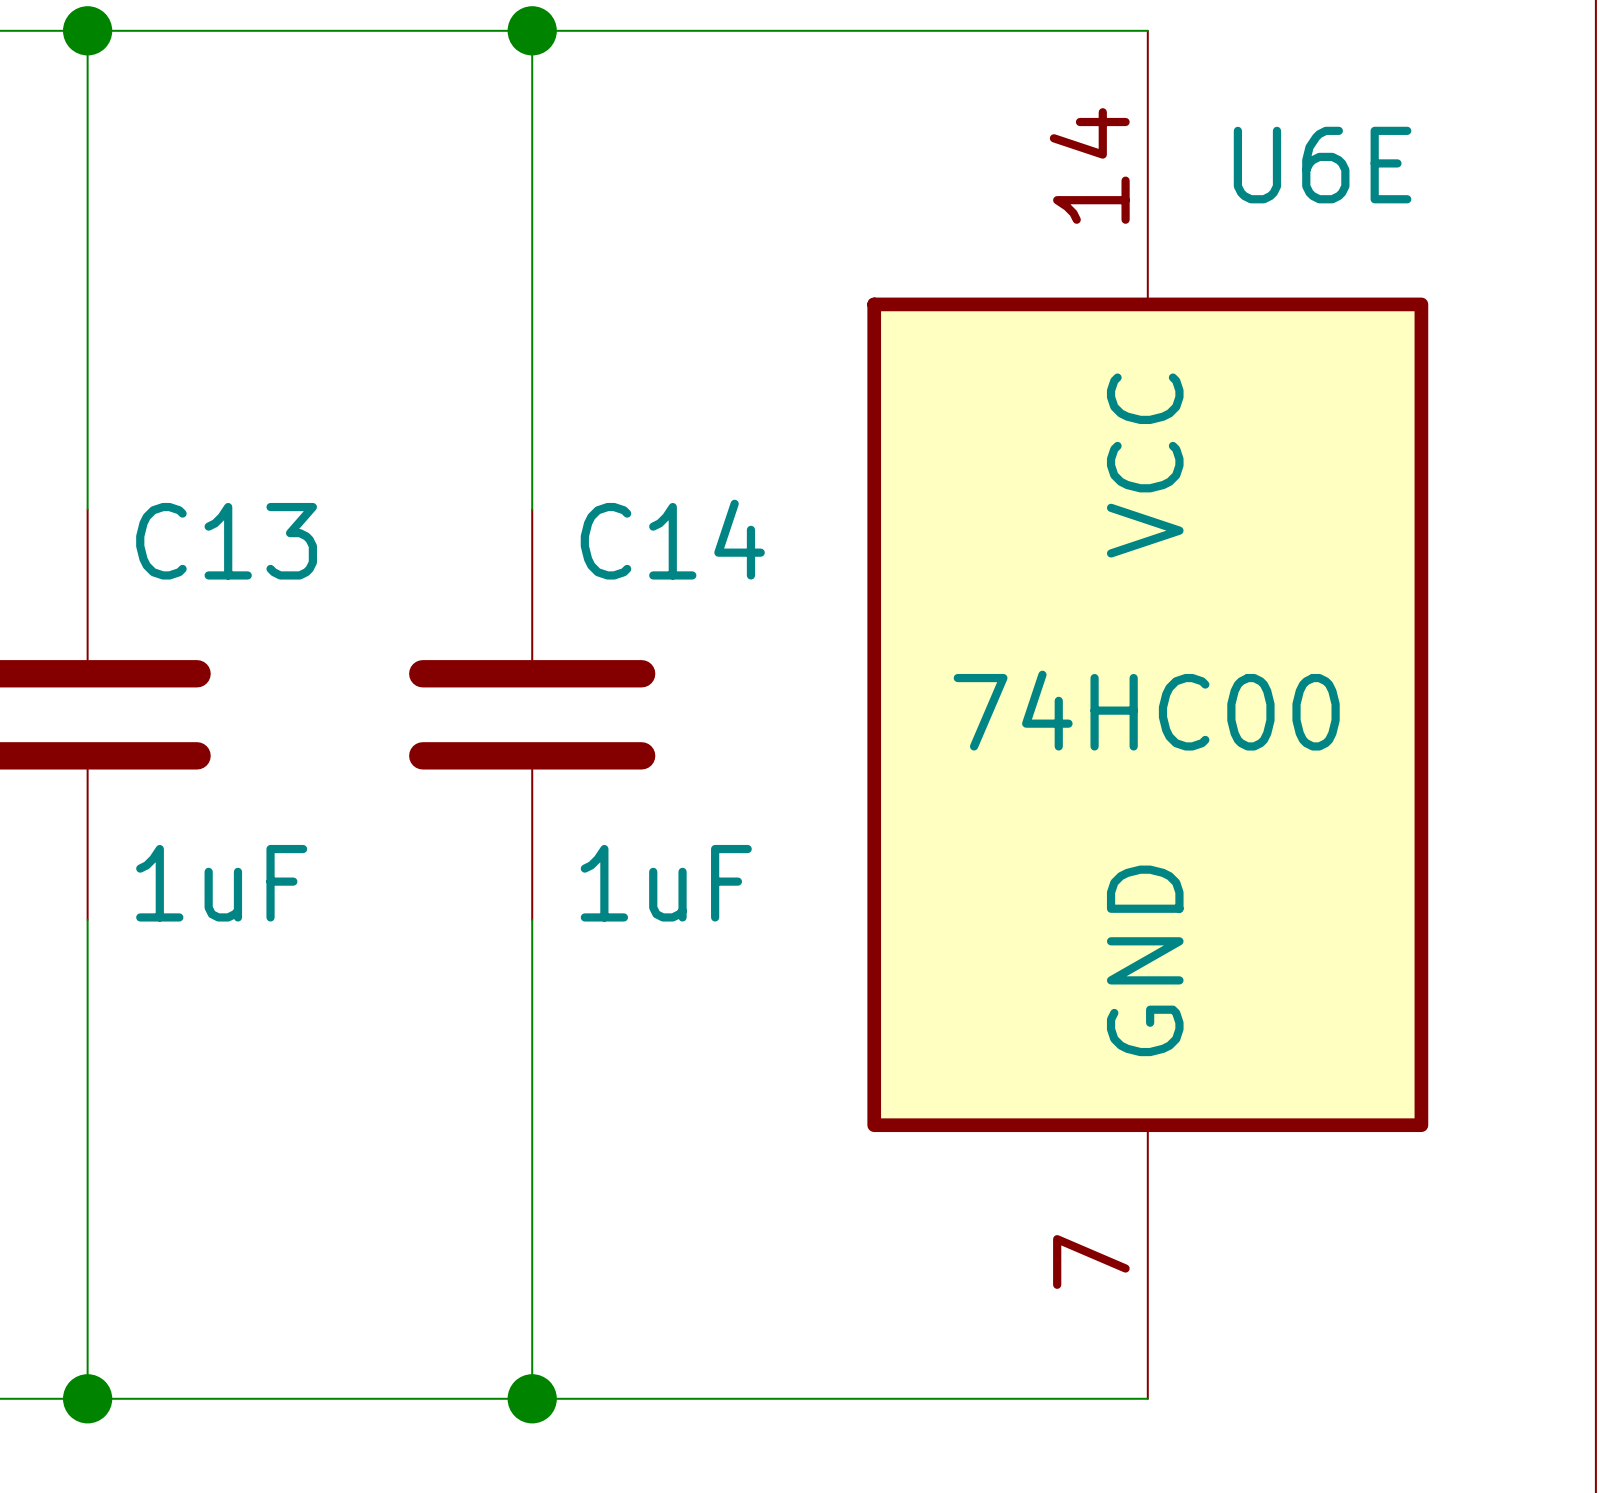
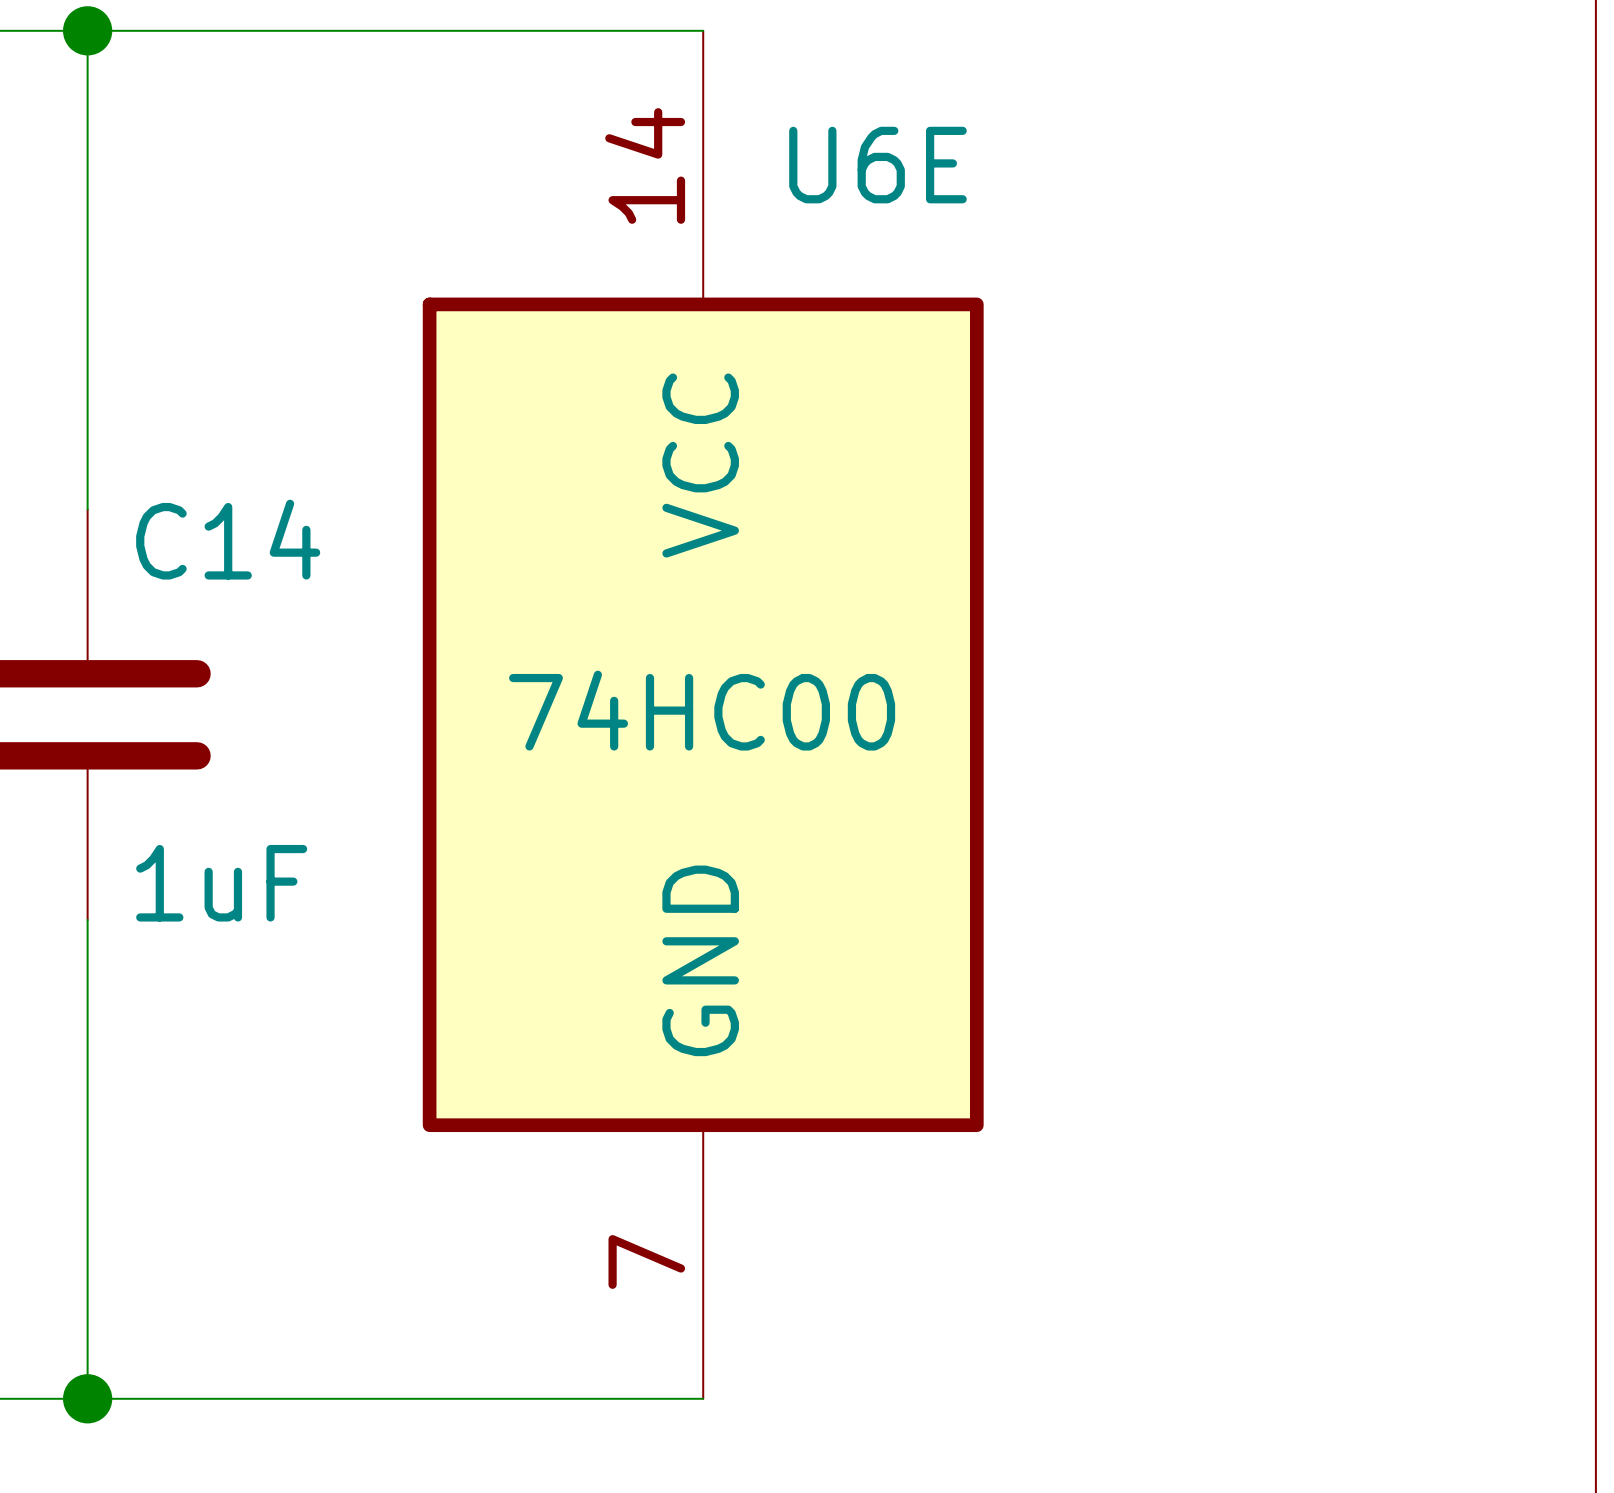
wire: (532, 30) (532, 509) -> none
junction: (532, 30) -> none
wire: (703, 30) (1147, 30) -> none
C13 name: C13 (226, 541) -> C14 (228, 539)
C14: 1uF (532, 714) -> none
U6E position: (1147, 714) -> (703, 714)
wire: (532, 920) (532, 1398) -> none
junction: (532, 1398) -> none
wire: (703, 1398) (1147, 1398) -> none

